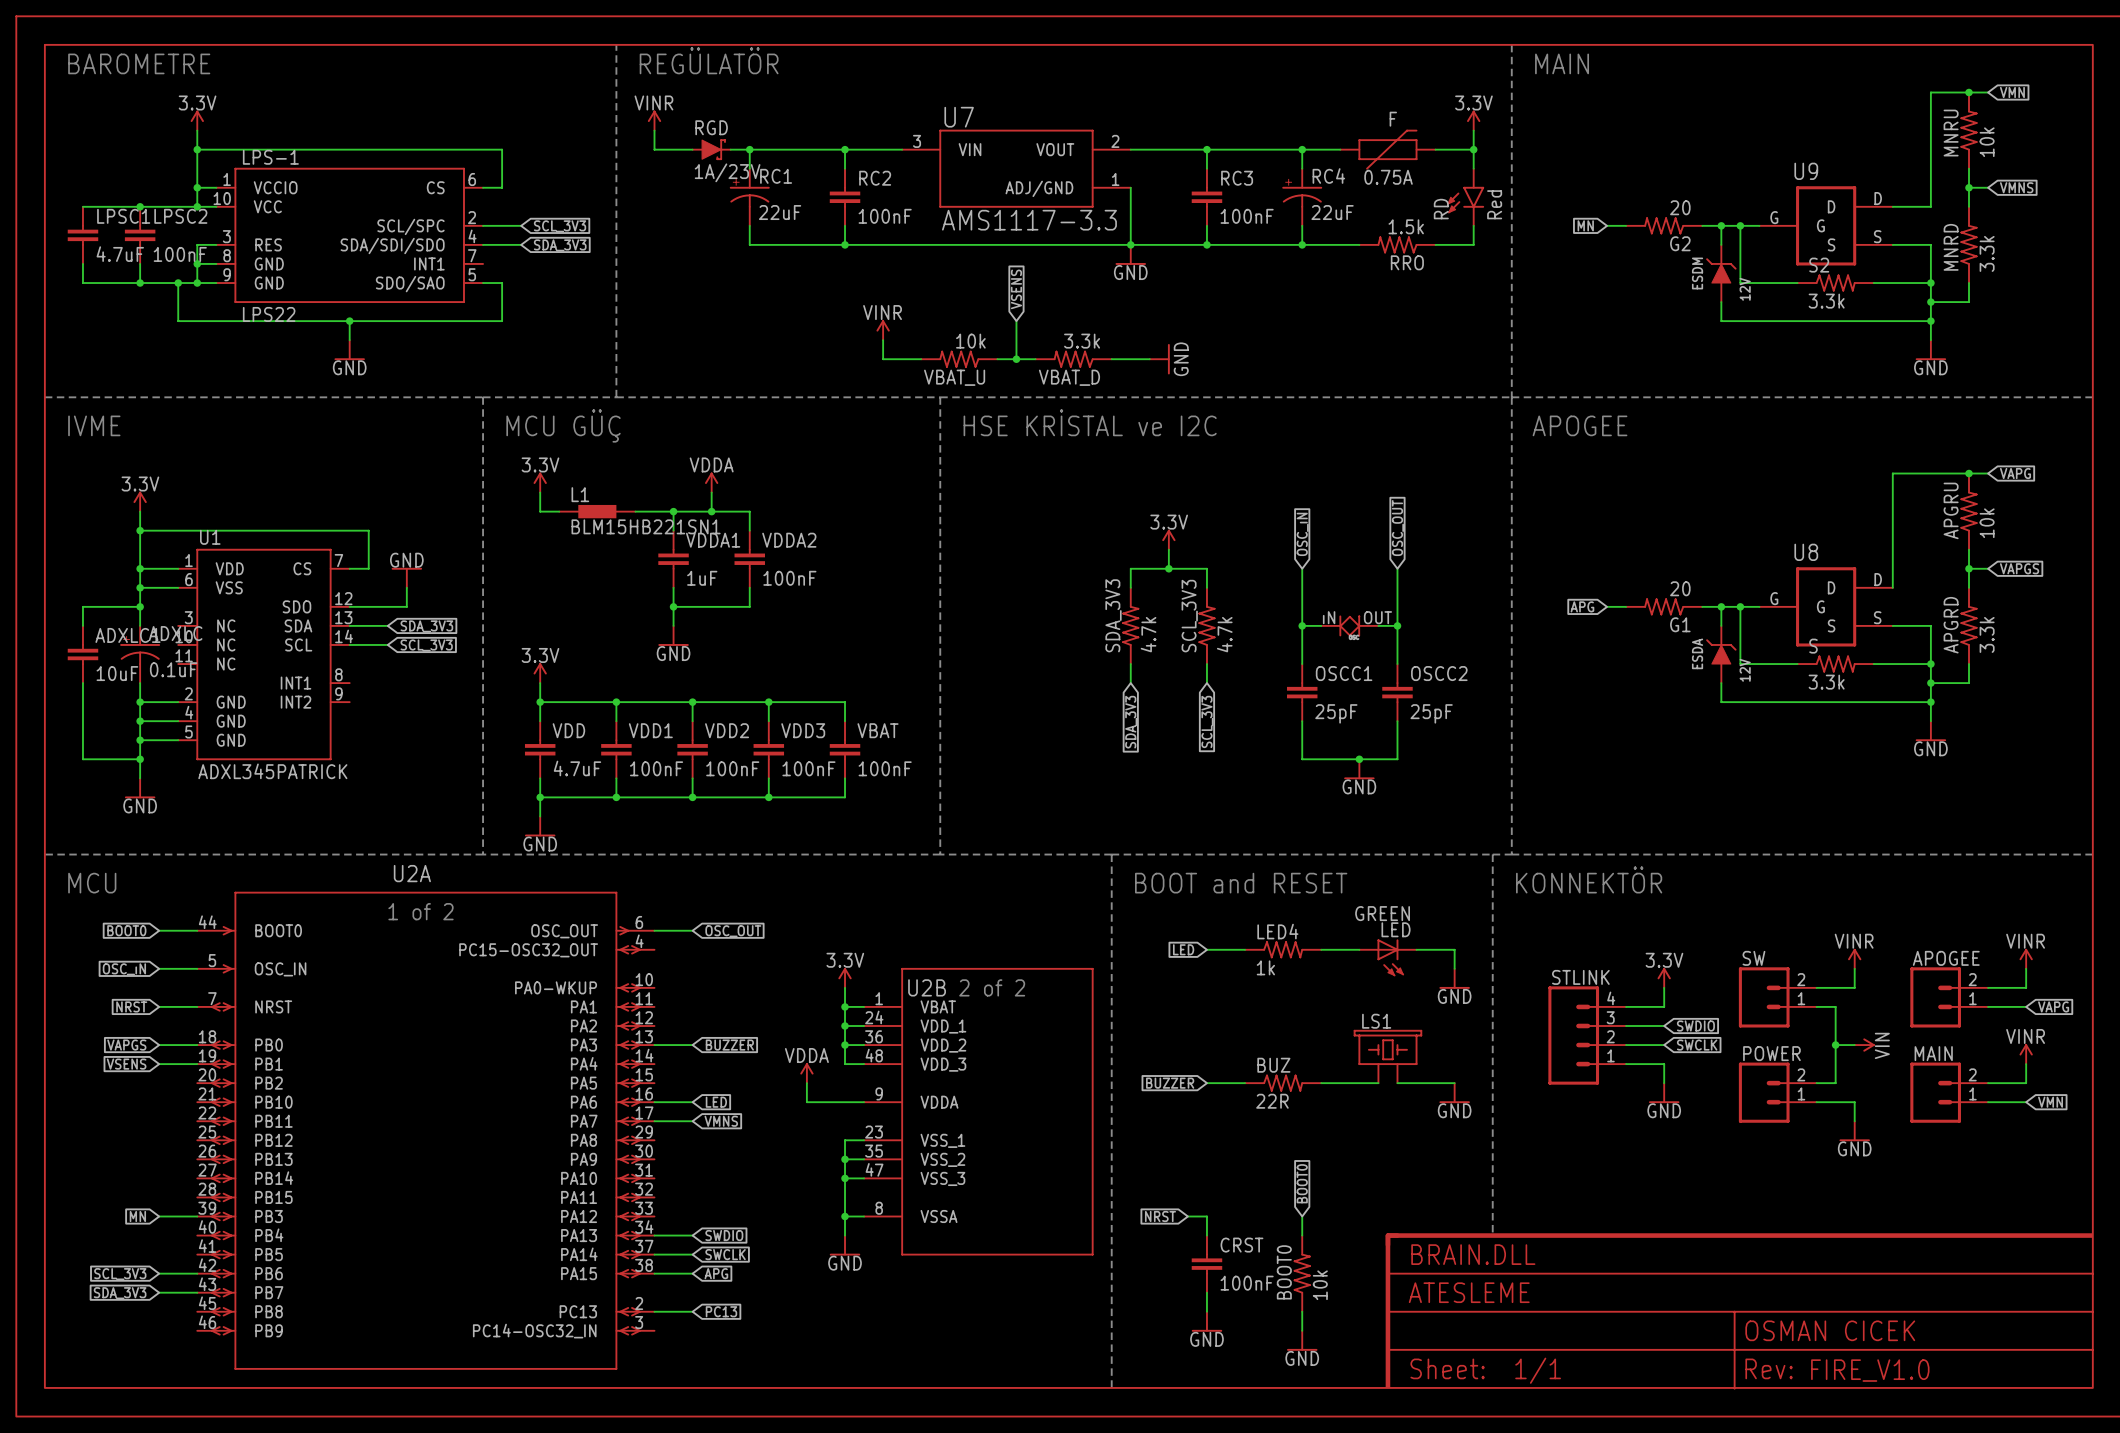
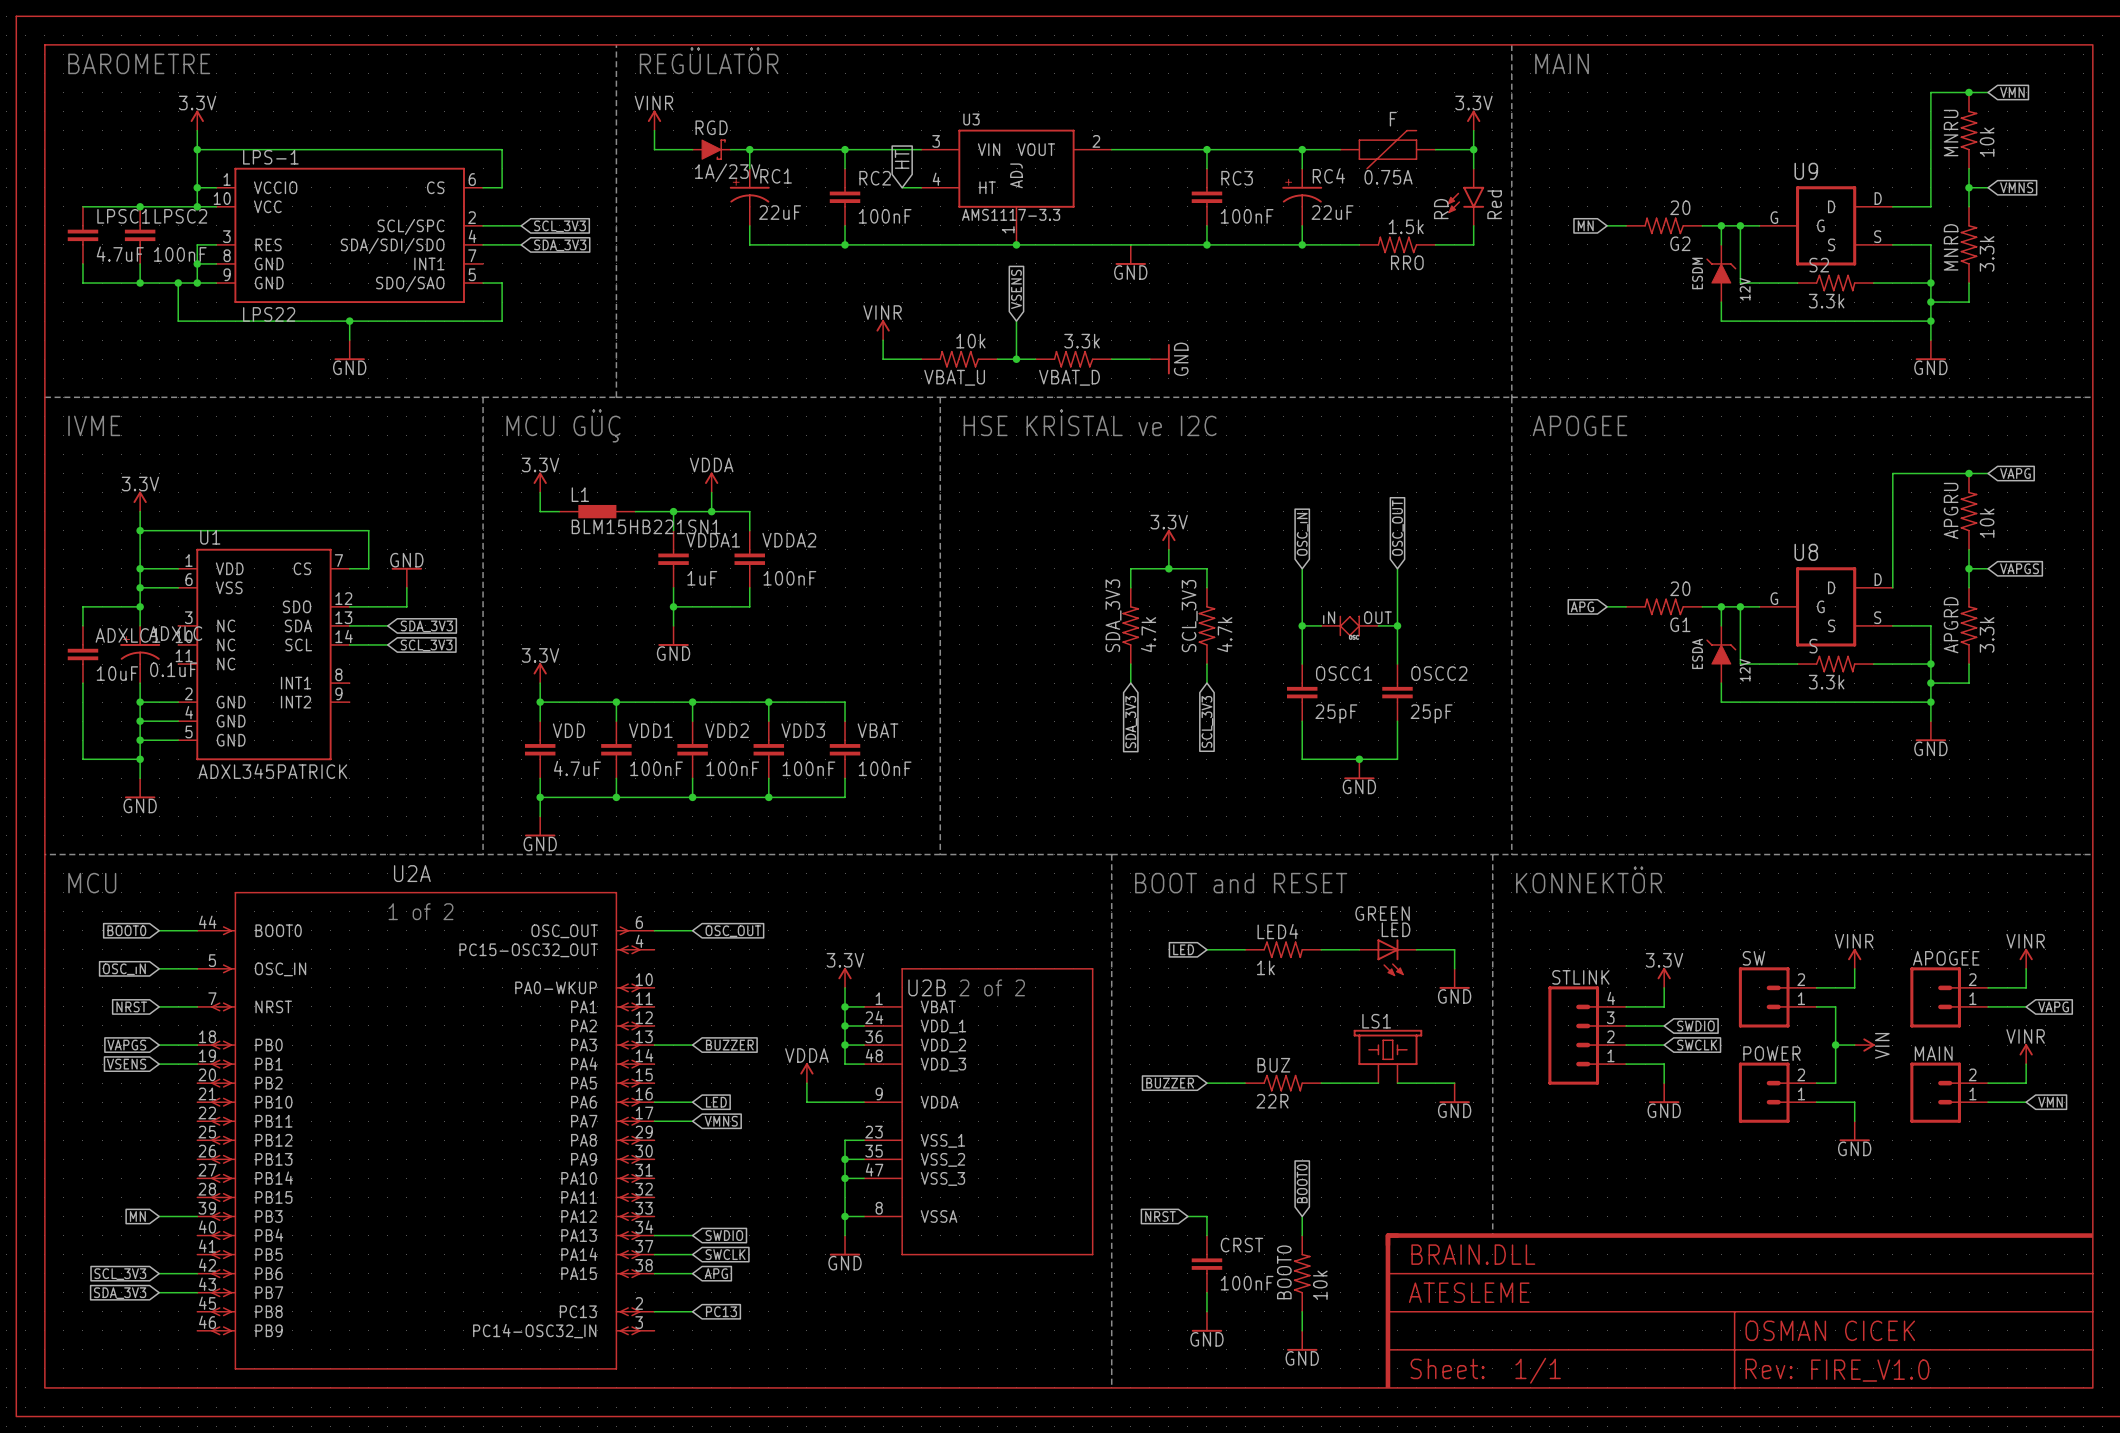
global label: none -> HT (902, 159)
U7: AMS1117-3.3 (1016, 168) -> none
wire: none -> (902, 187) (921, 187)
U3: none -> AMS1117-3.3 (1016, 187)
wire: (1130, 187) (1130, 244) -> none
junction: none -> (1016, 244)
junction: (1130, 244) -> none

